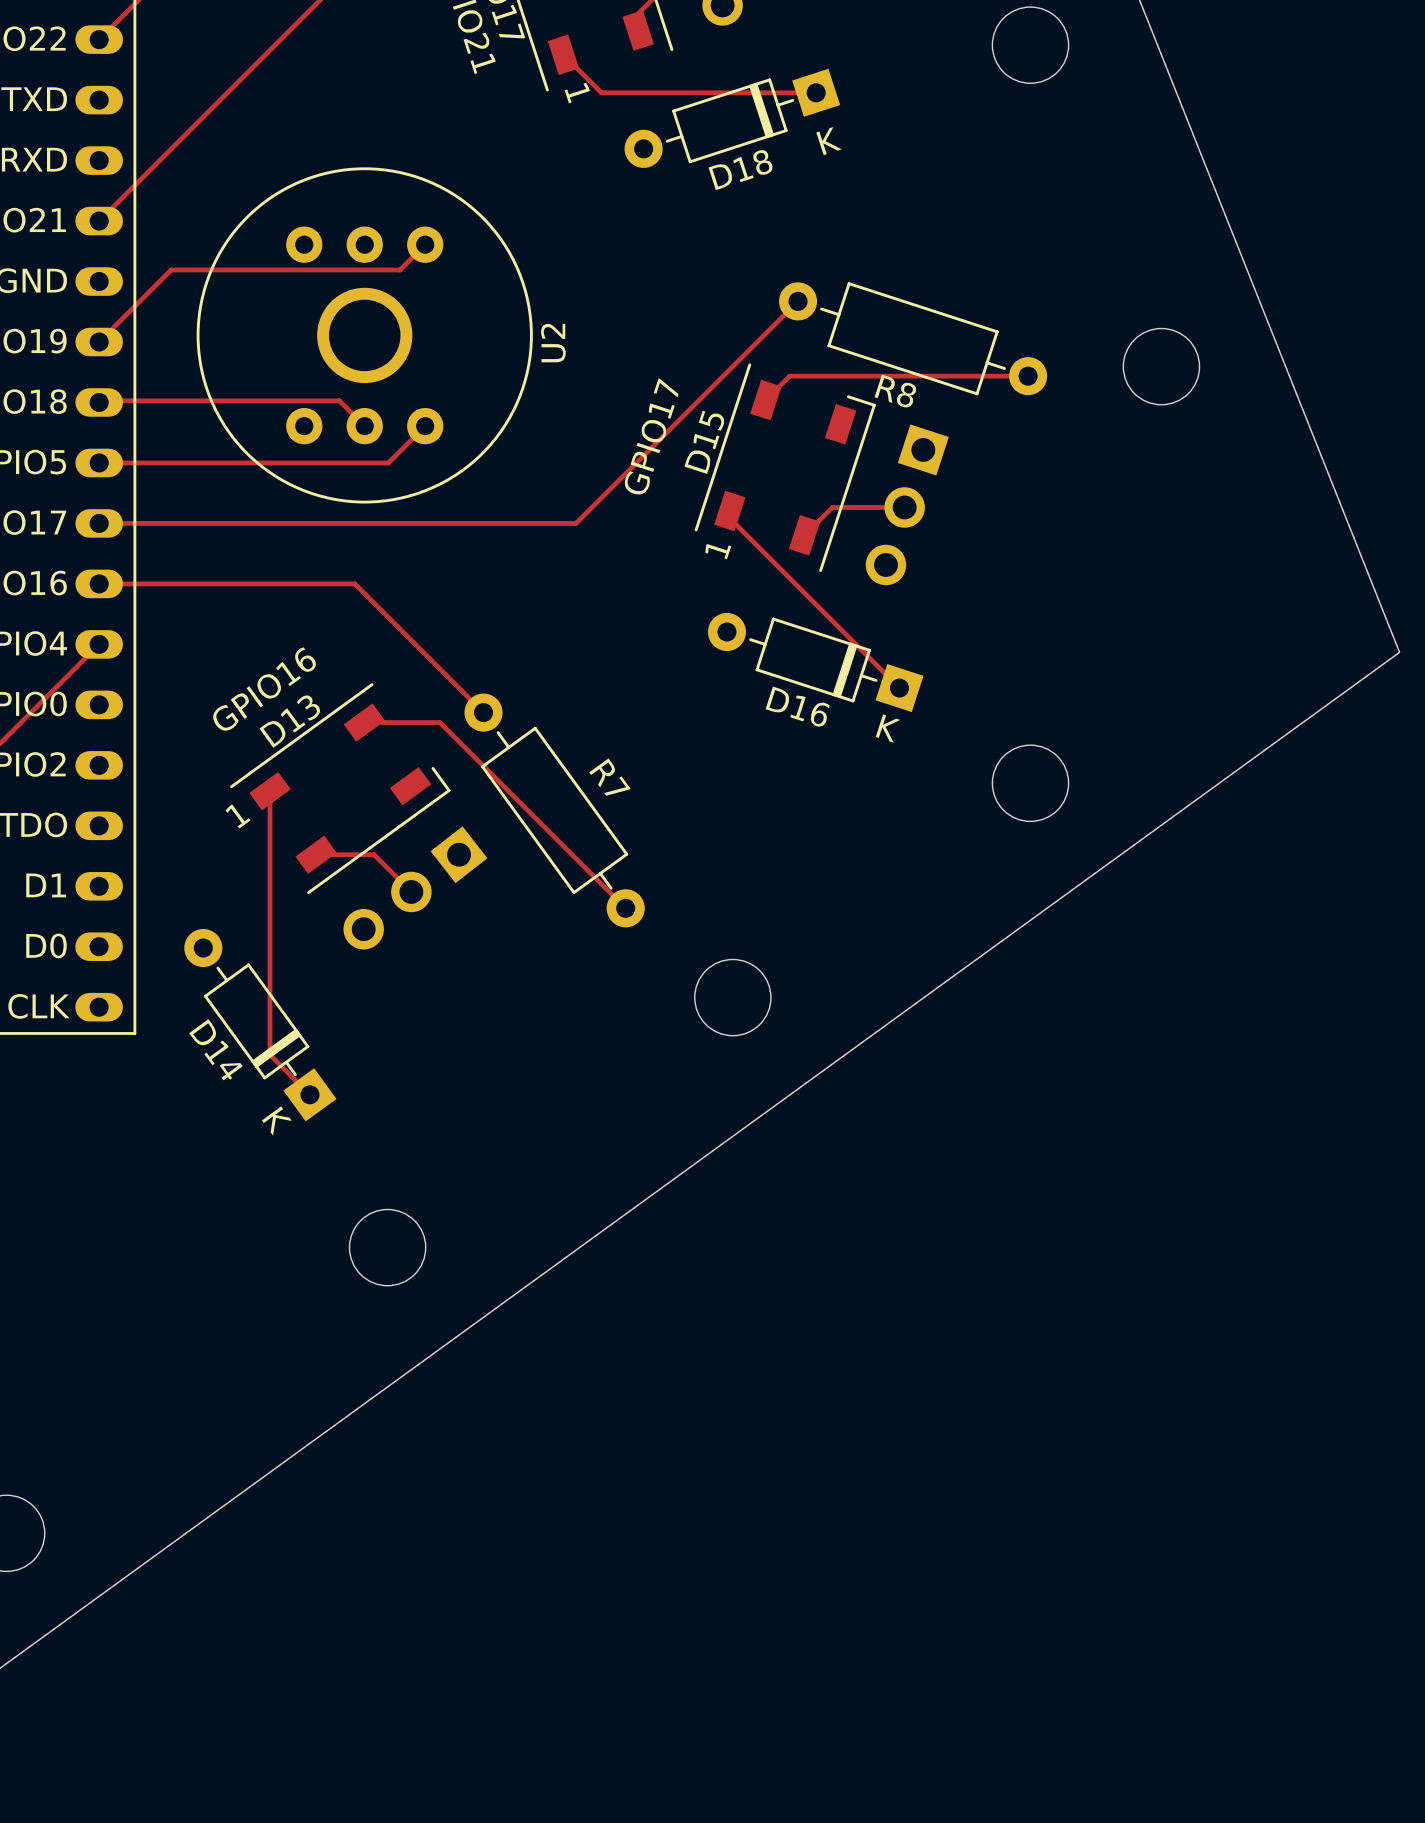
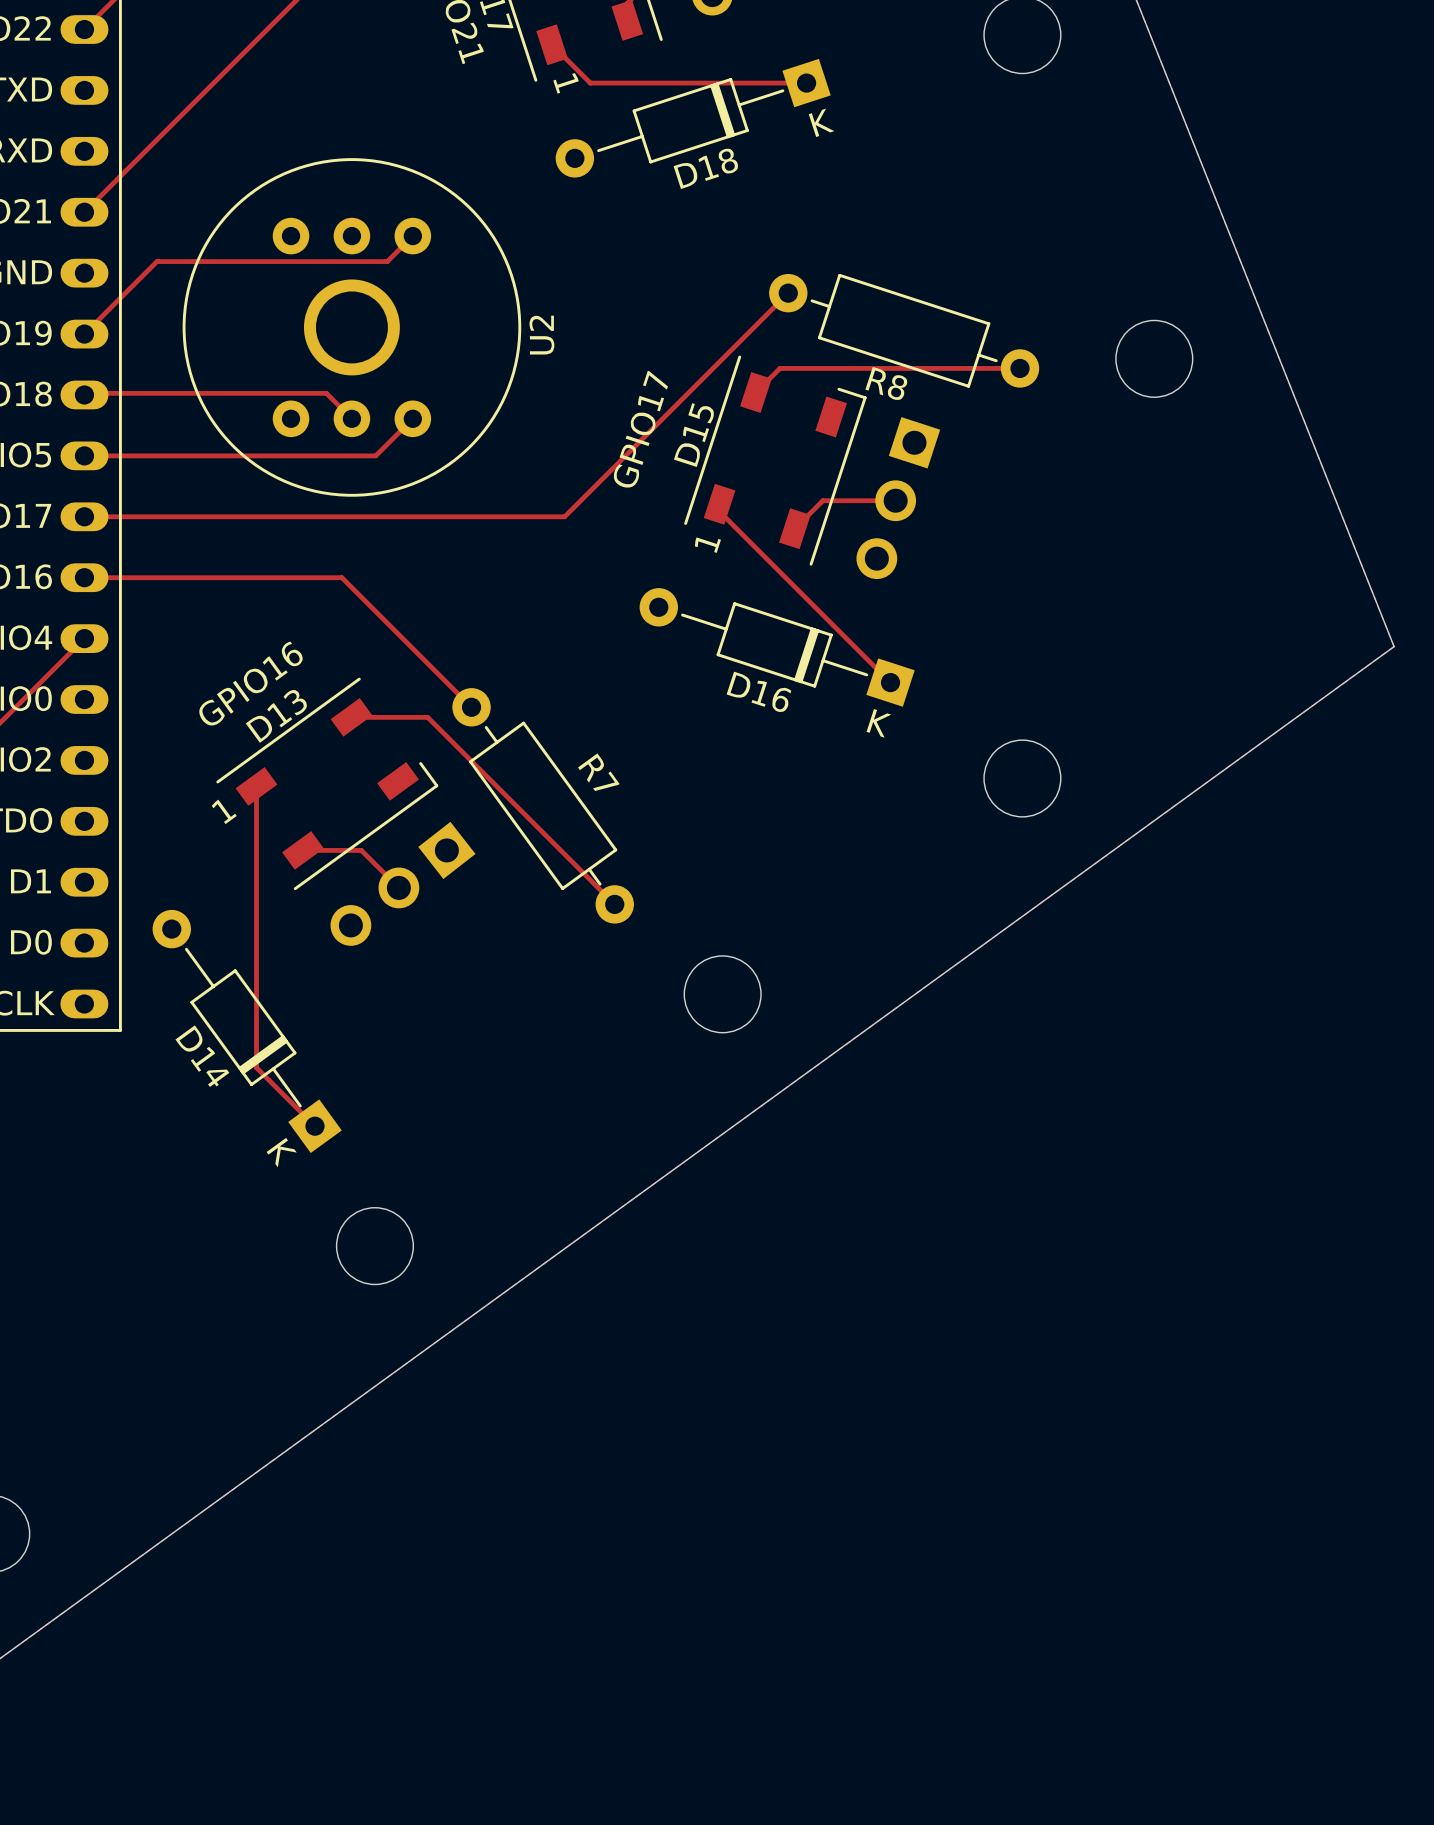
D18 footprint: [624, 68, 841, 168] -> [555, 58, 831, 178]
D16 footprint: [707, 612, 924, 713] -> [639, 588, 915, 707]
D14 footprint: [184, 928, 337, 1122] -> [152, 909, 342, 1154]
track: (269, 1054) (309, 1094) -> (256, 1051) (256, 1067) (315, 1126)

